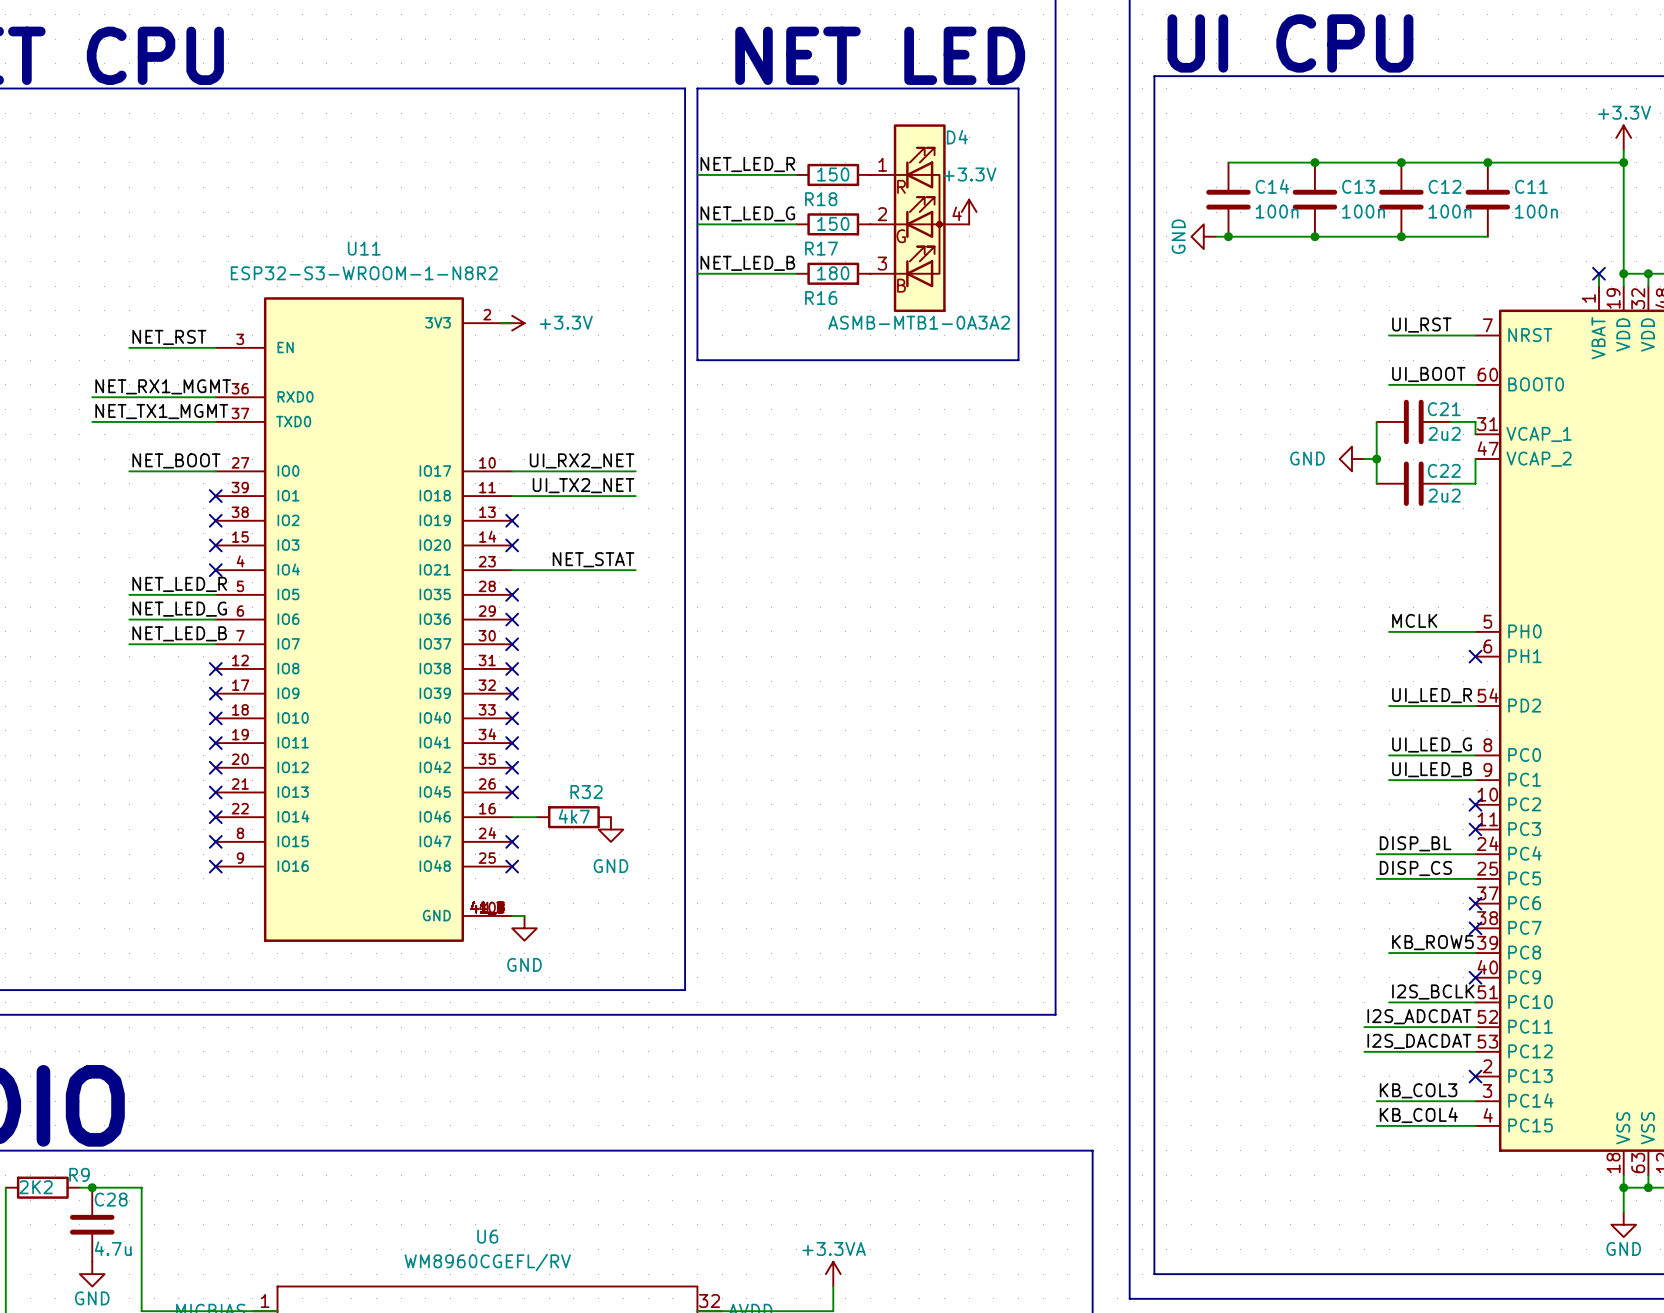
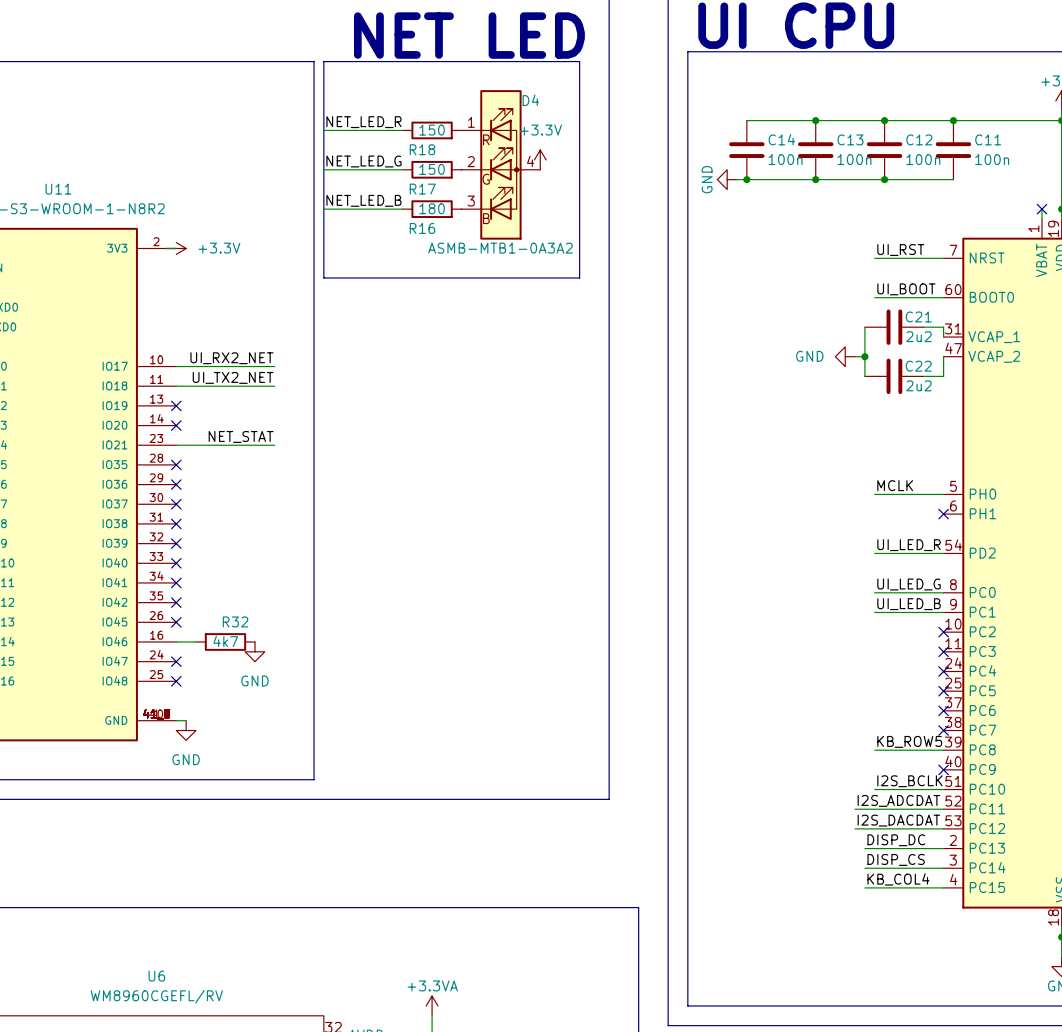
label: DISP_BL (1415, 843) -> none
wire: (1376, 854) (1475, 854) -> none
no-connect mark: none -> (943, 671)
label: DISP_CS (1415, 868) -> none
wire: (1376, 878) (1475, 878) -> (864, 848) (943, 848)
no-connect mark: none -> (943, 691)
label: none -> DISP_DC (896, 840)
no-connect mark: (1475, 1076) -> none
label: KB_COL3 (1418, 1090) -> DISP_CS (896, 859)

